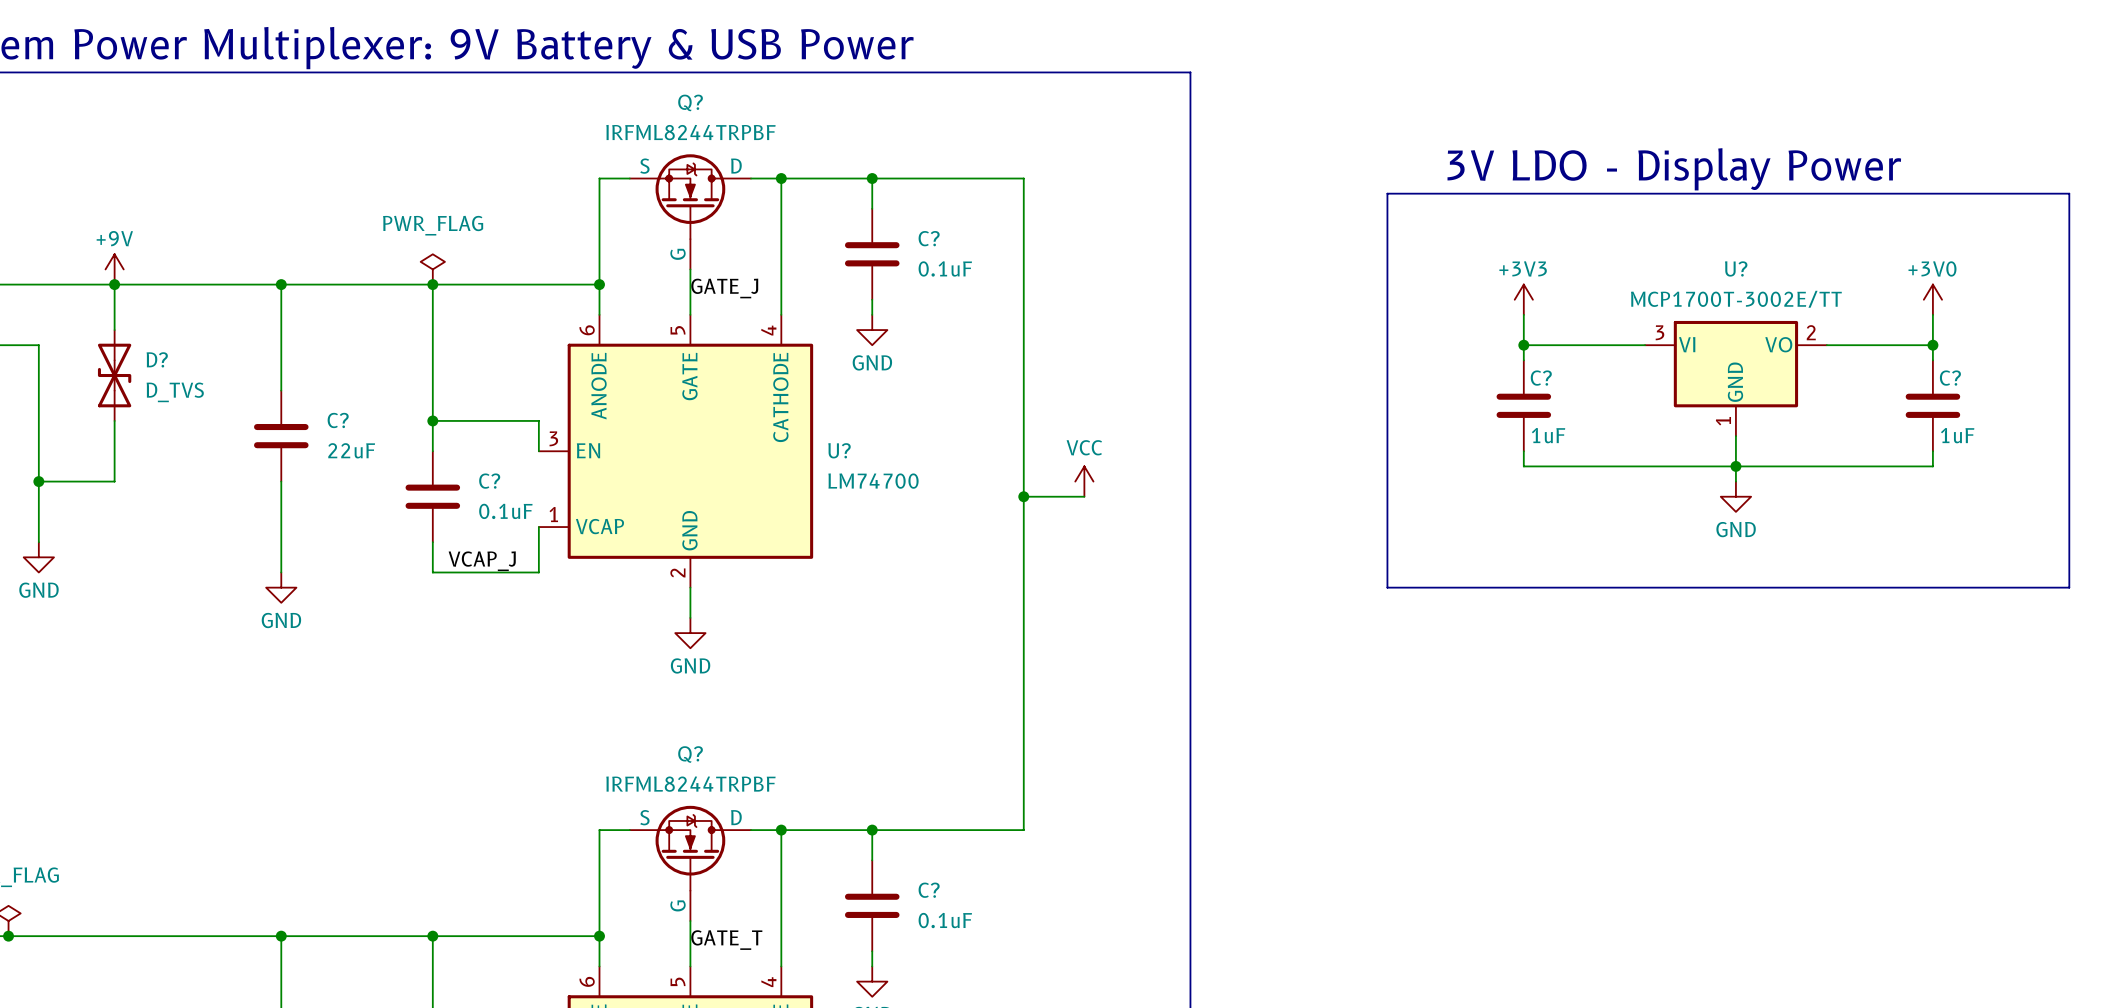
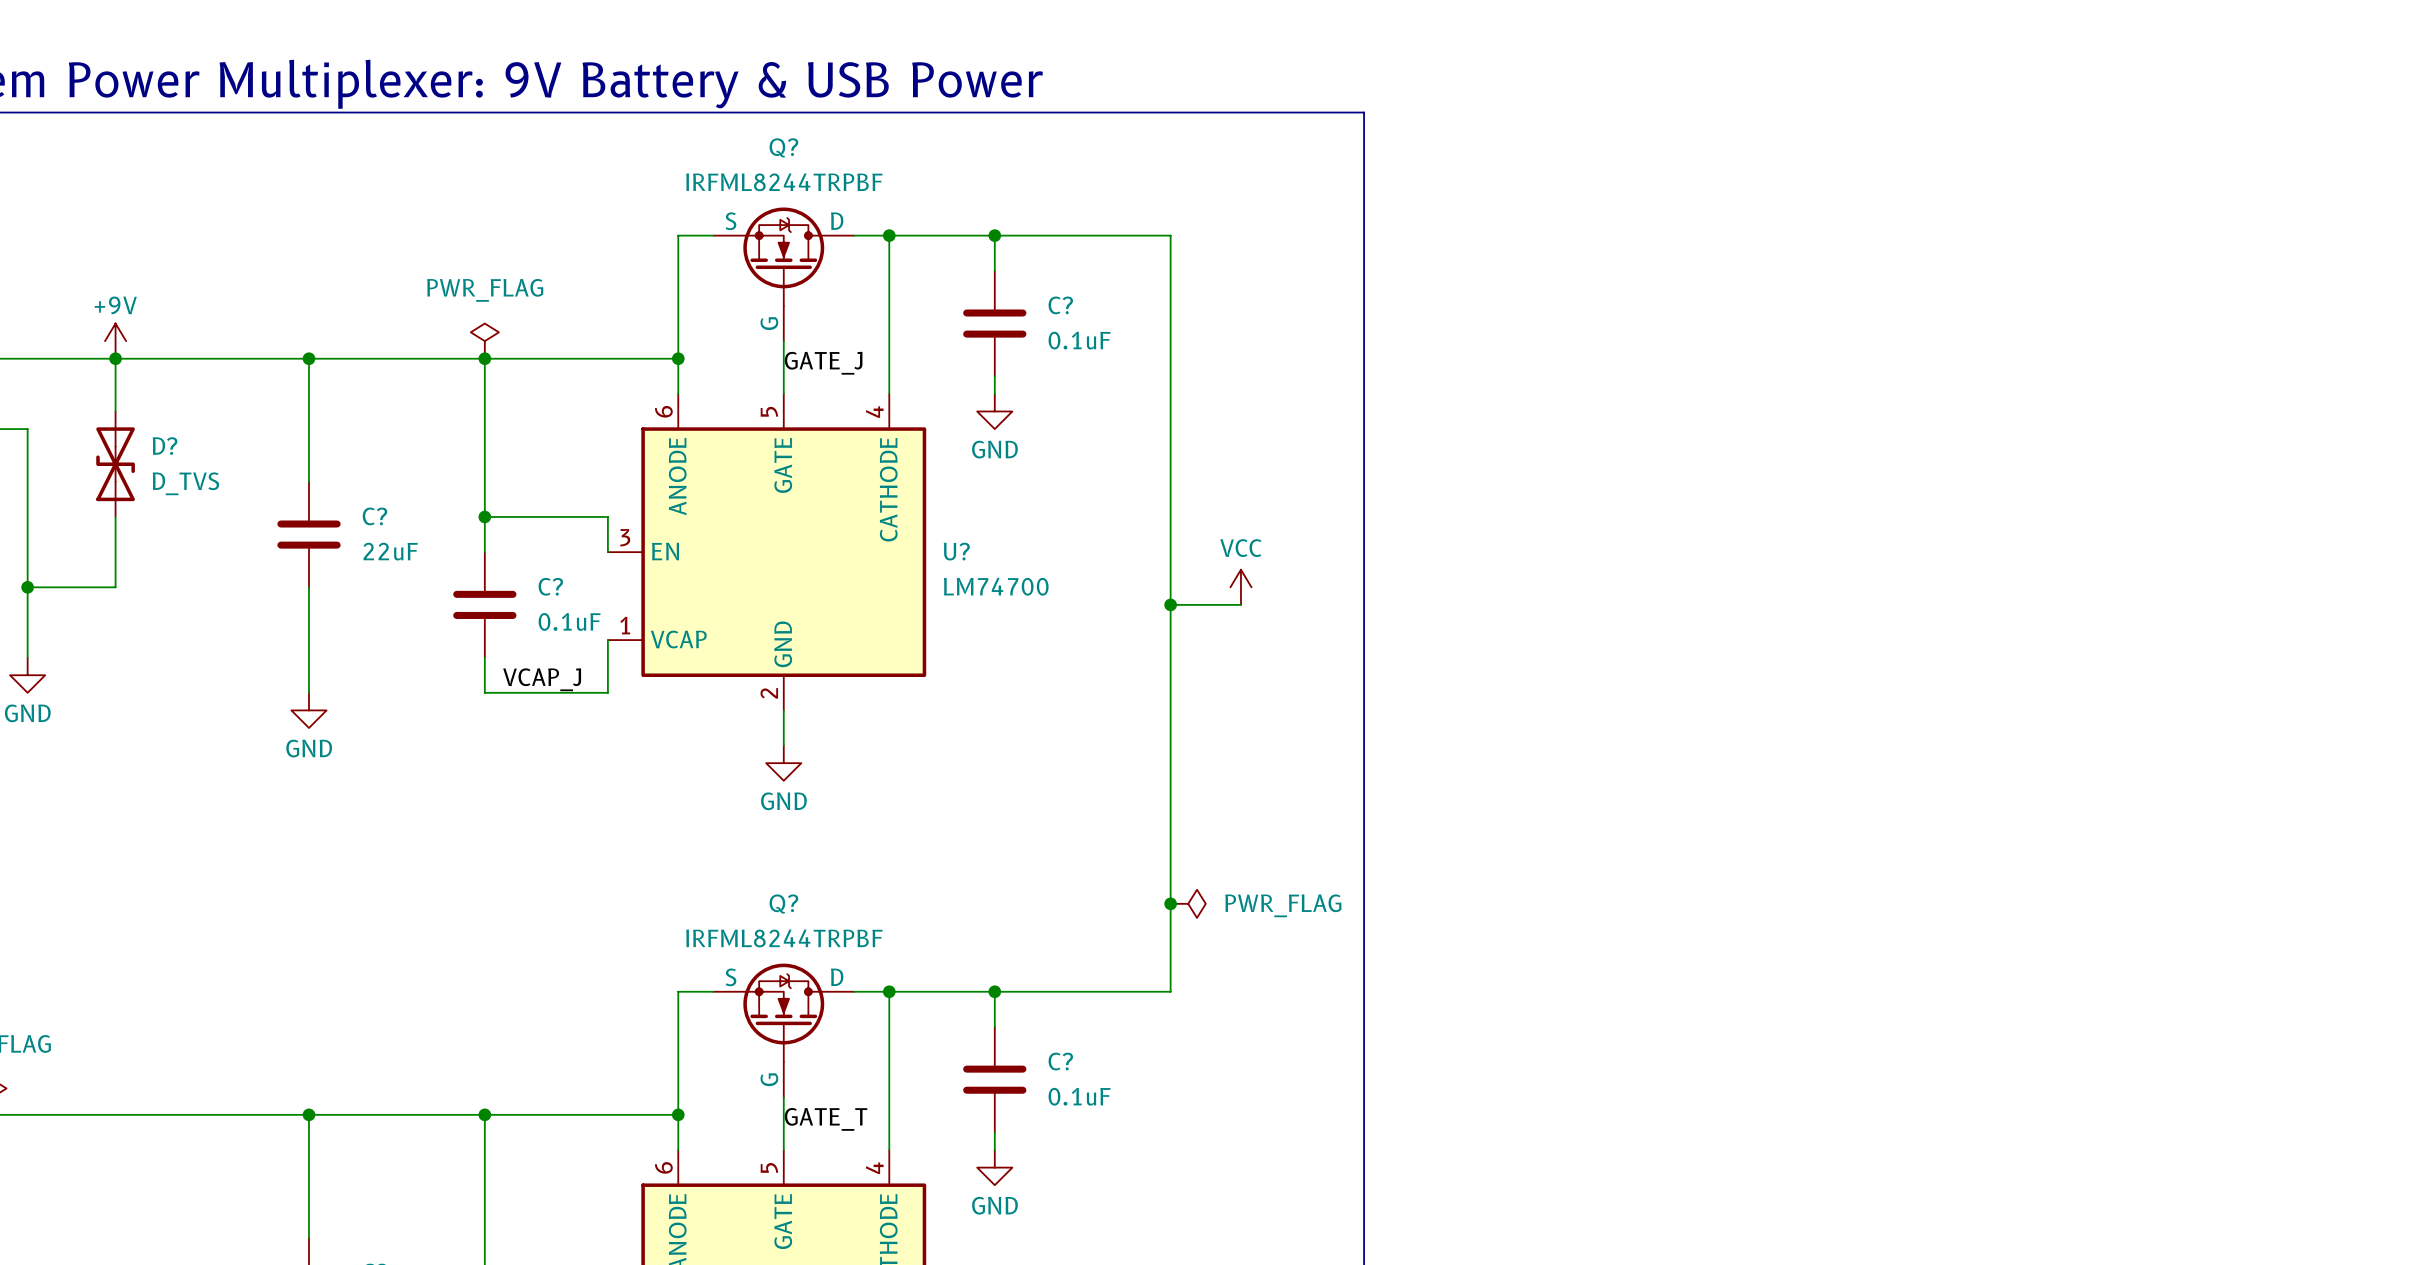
text: 3V LDO - Display Power (1674, 169) -> none
line: (1387, 193) (2069, 193) (2069, 587) (1387, 587) (1387, 193) -> none
power symbol: +3V3 (1523, 299) -> none
power symbol: +3V0 (1932, 299) -> none
wire: (1523, 314) (1523, 360) -> none
wire: (1932, 314) (1932, 360) -> none
wire: (1523, 345) (1645, 345) -> none
junction: (1523, 345) -> none
wire: (1826, 345) (1932, 345) -> none
junction: (1932, 345) -> none
U?: MCP1700T-3002E/TT (1735, 378) -> none
C?: 1uF (1523, 405) -> none
C?: 1uF (1932, 405) -> none
wire: (1735, 436) (1735, 481) -> none
wire: (1523, 451) (1523, 466) (1932, 466) (1932, 451) -> none
junction: (1735, 466) -> none
power symbol: GND (1735, 496) -> none
junction: none -> (1170, 903)
power symbol: none -> PWR_FLAG (1188, 903)

